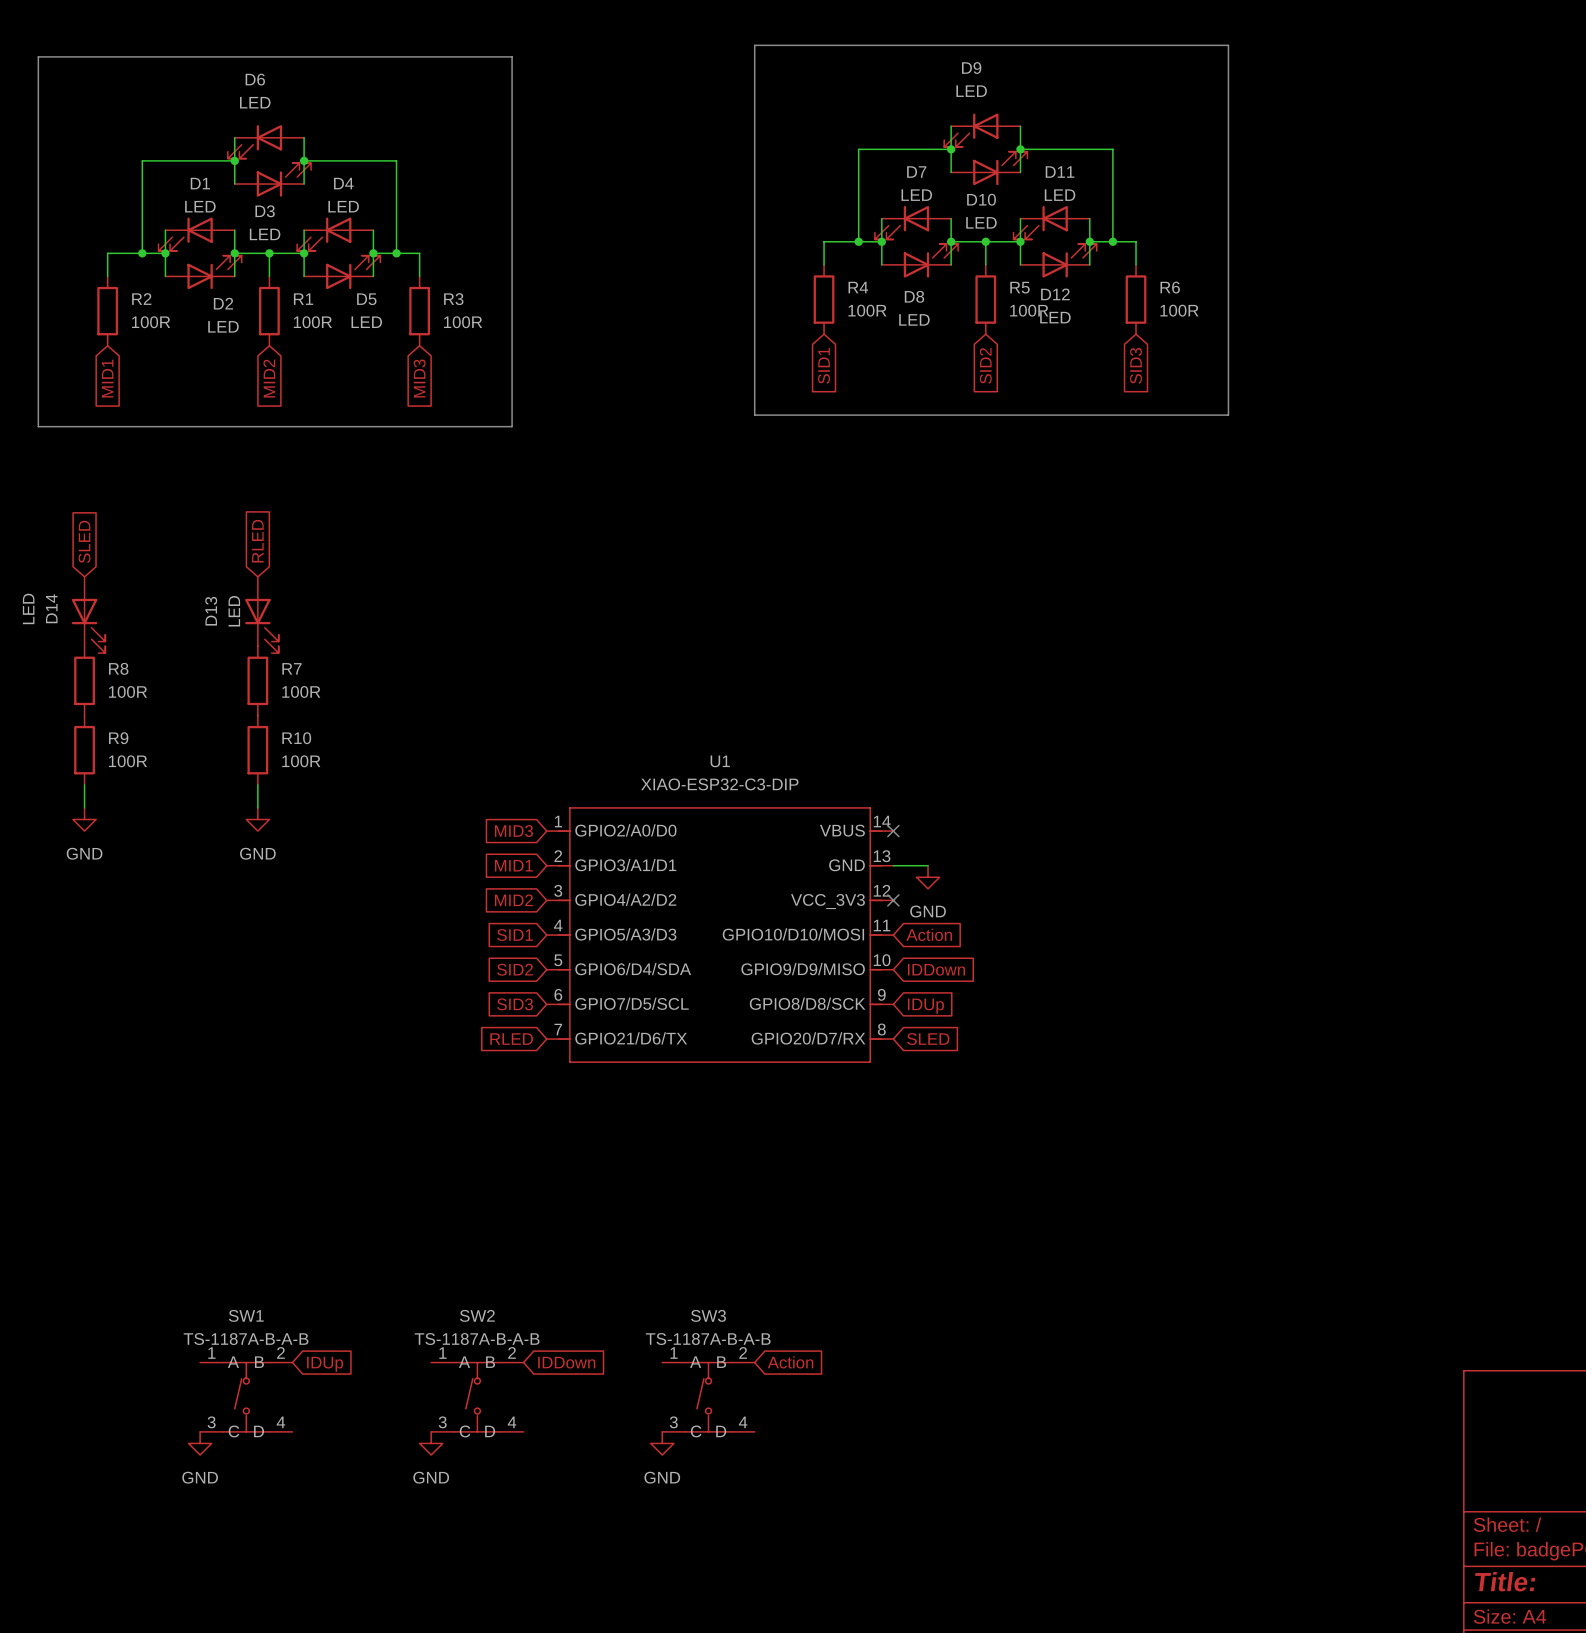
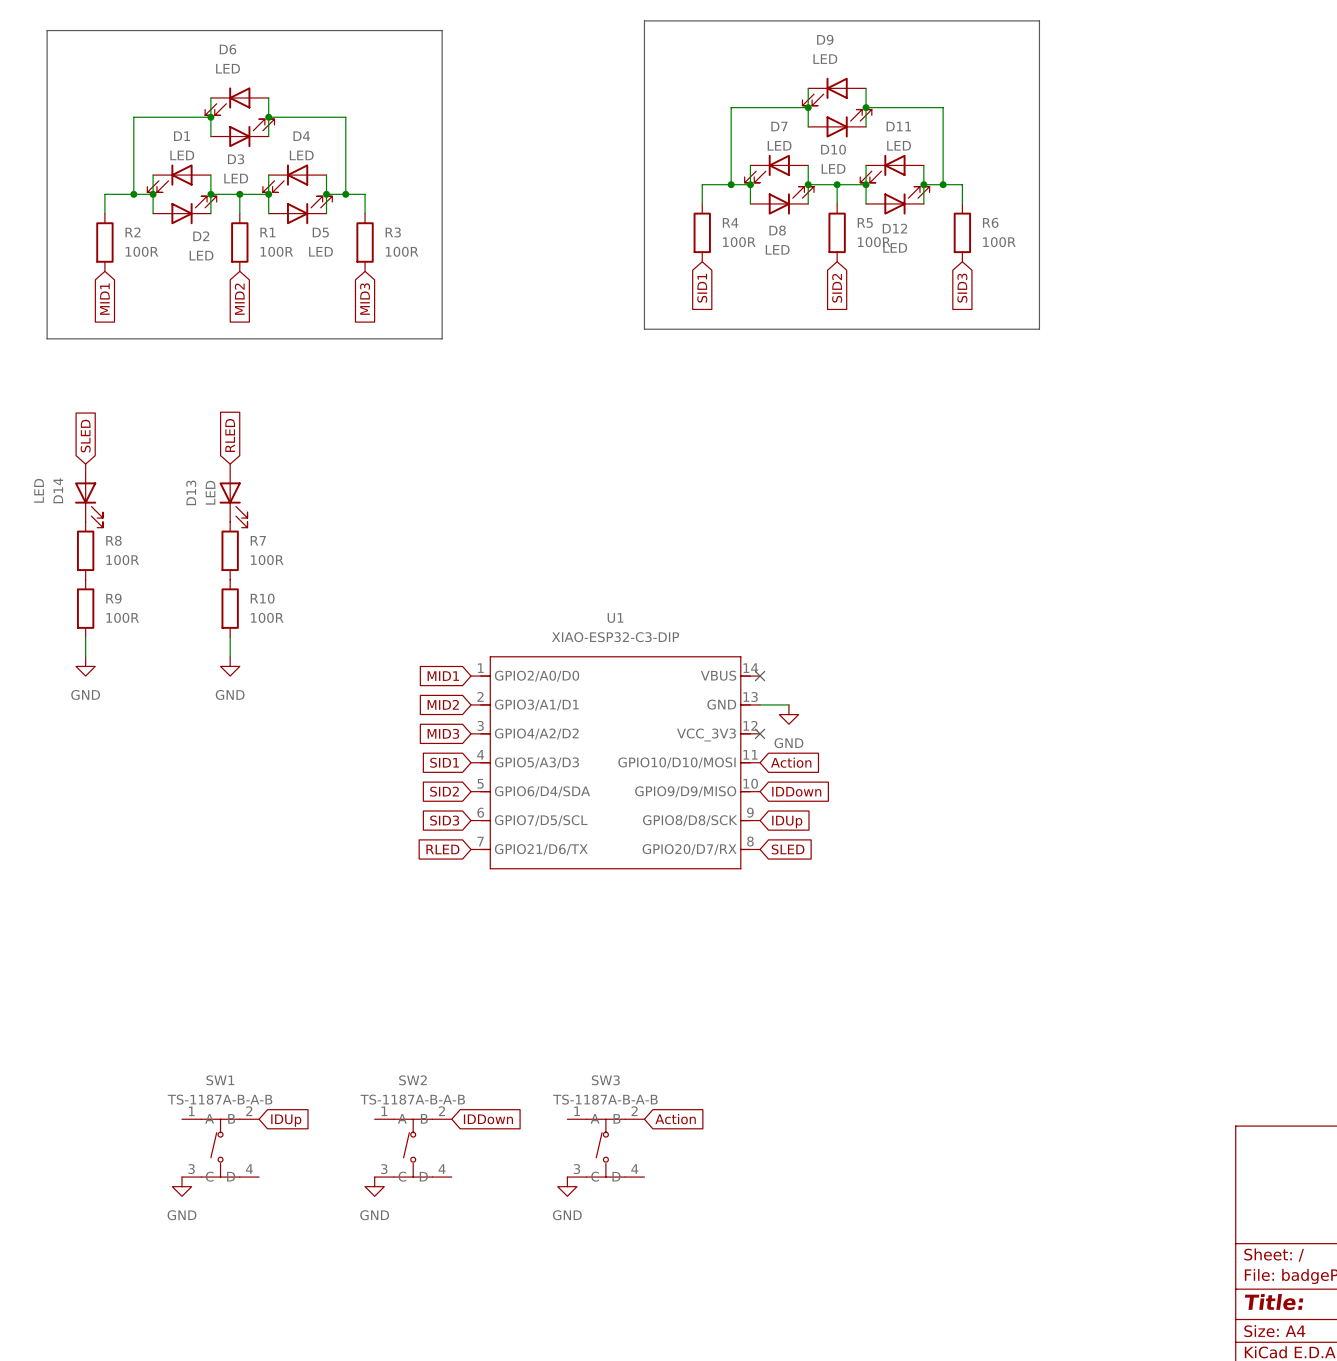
global label: MID3 (513, 831) -> MID1 (443, 676)
global label: MID1 (513, 865) -> MID2 (443, 704)
global label: MID2 (513, 900) -> MID3 (443, 733)

